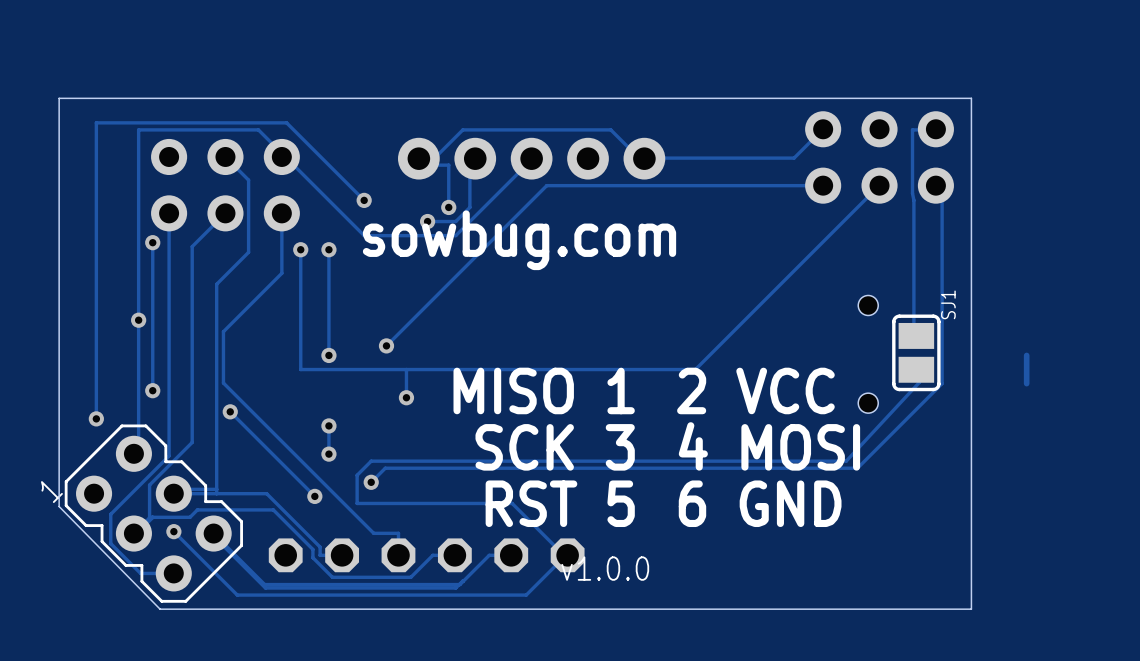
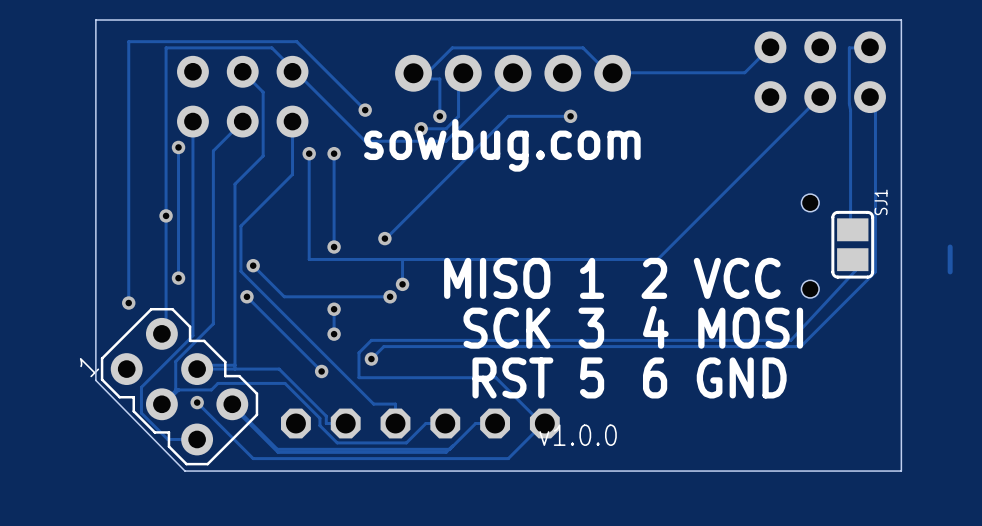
track: (823, 185) (546, 185) (386, 345) -> none
track: none -> (570, 116) (508, 116) (383, 240)
via: none -> (570, 116)
track: none -> (253, 265) (284, 296) (390, 296)
via: none -> (253, 265)
via: none -> (390, 296)

